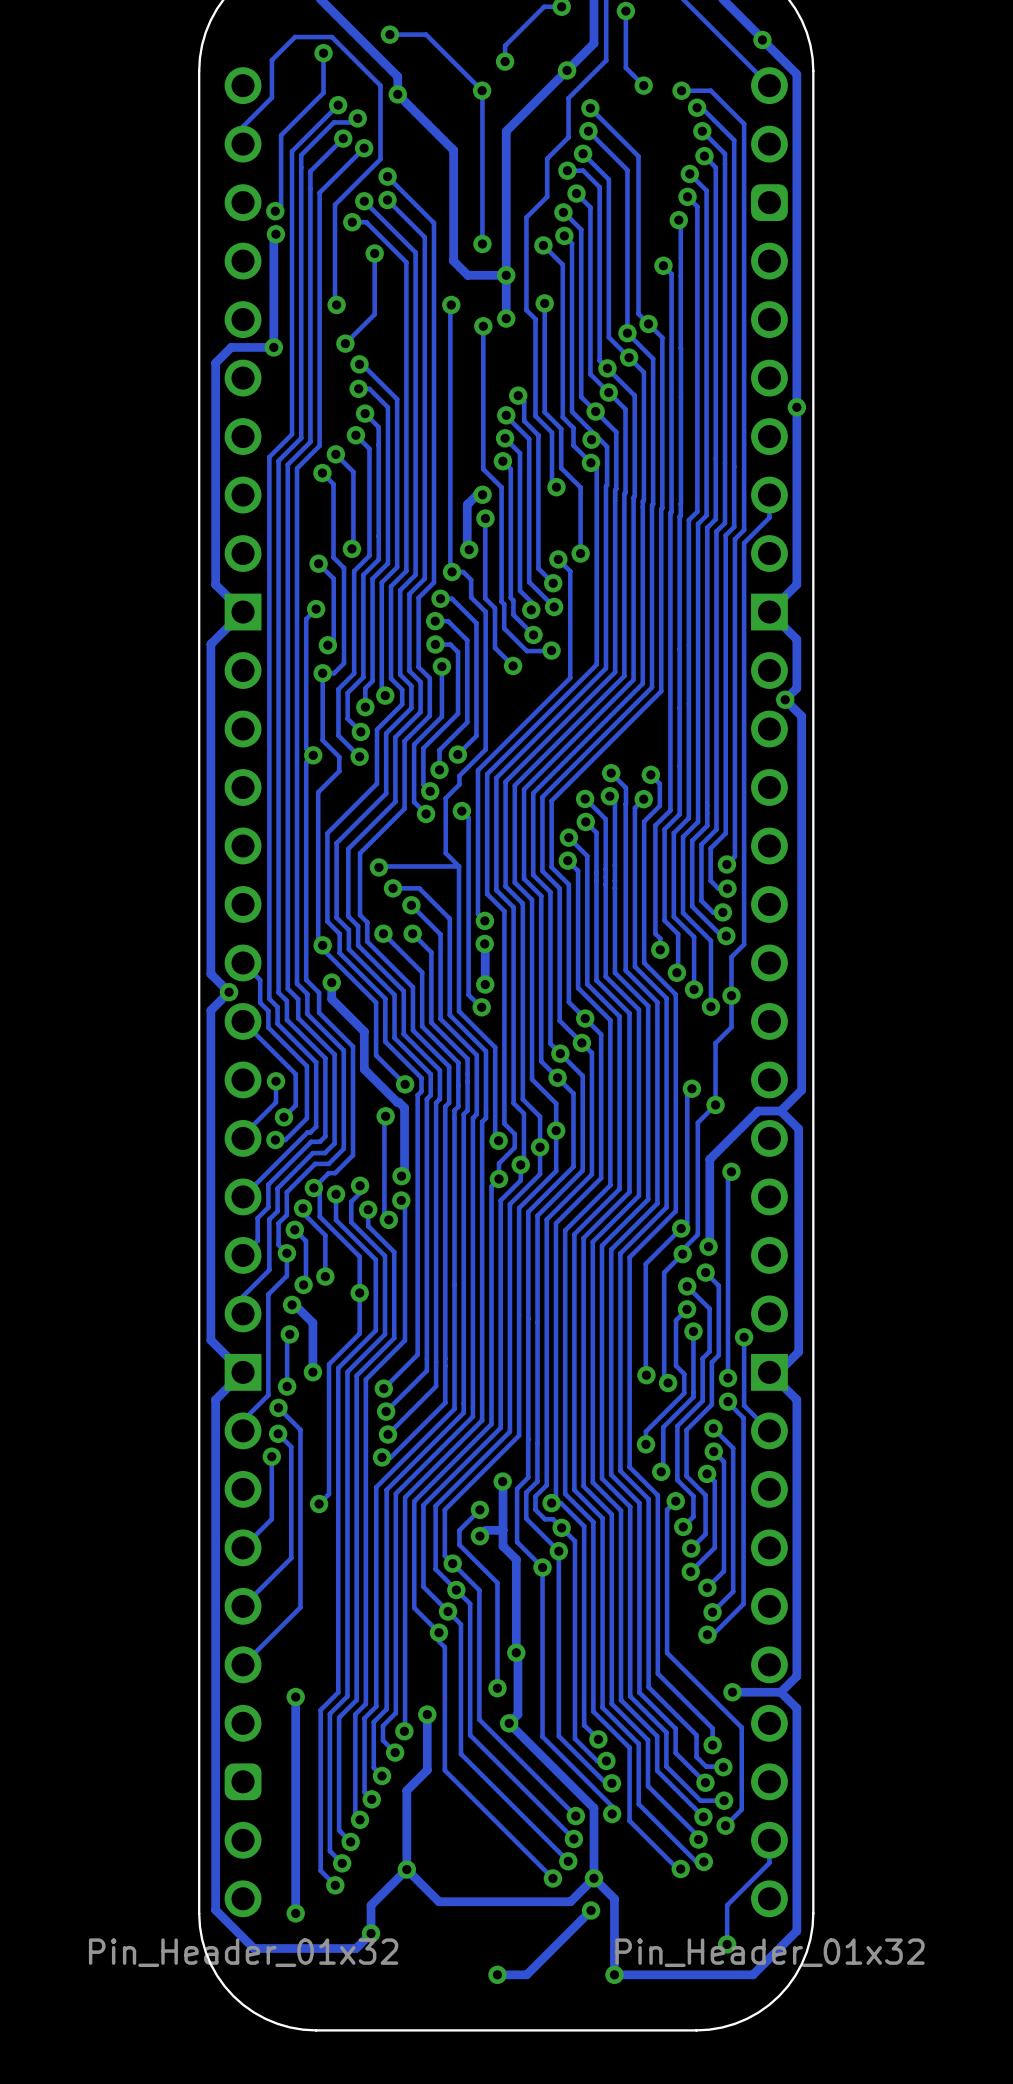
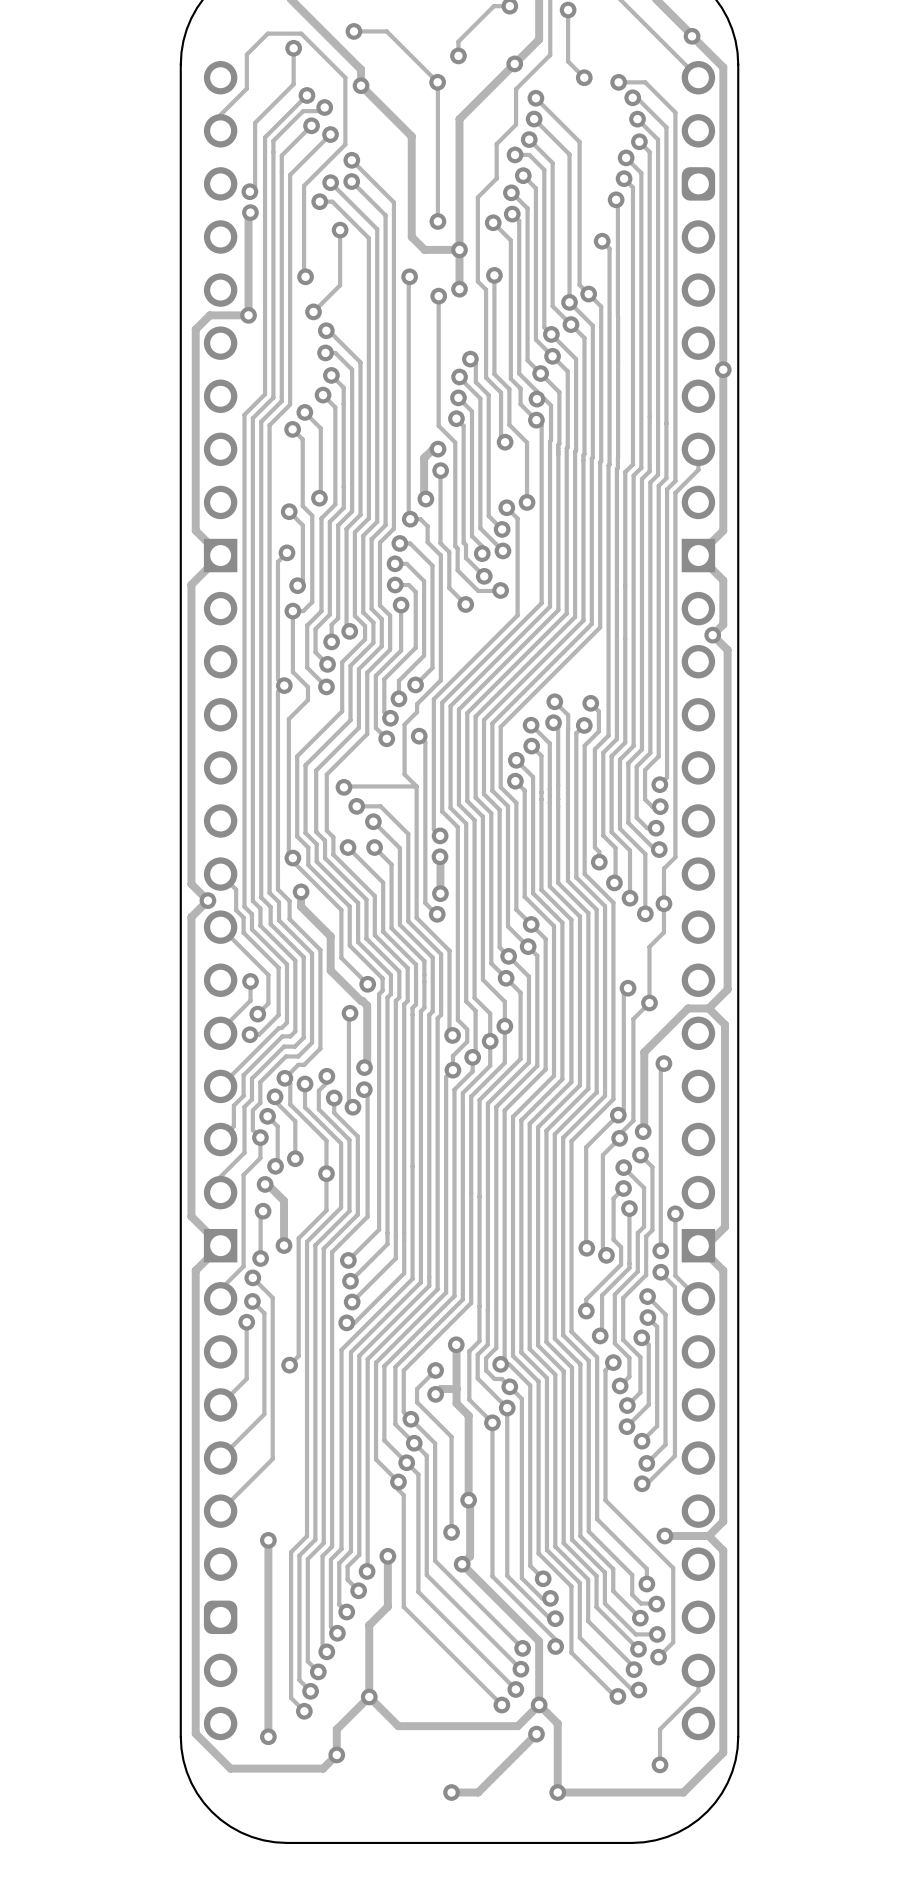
drawing: [88, 1938, 399, 1968] -> none
drawing: [615, 1938, 925, 1968] -> none

